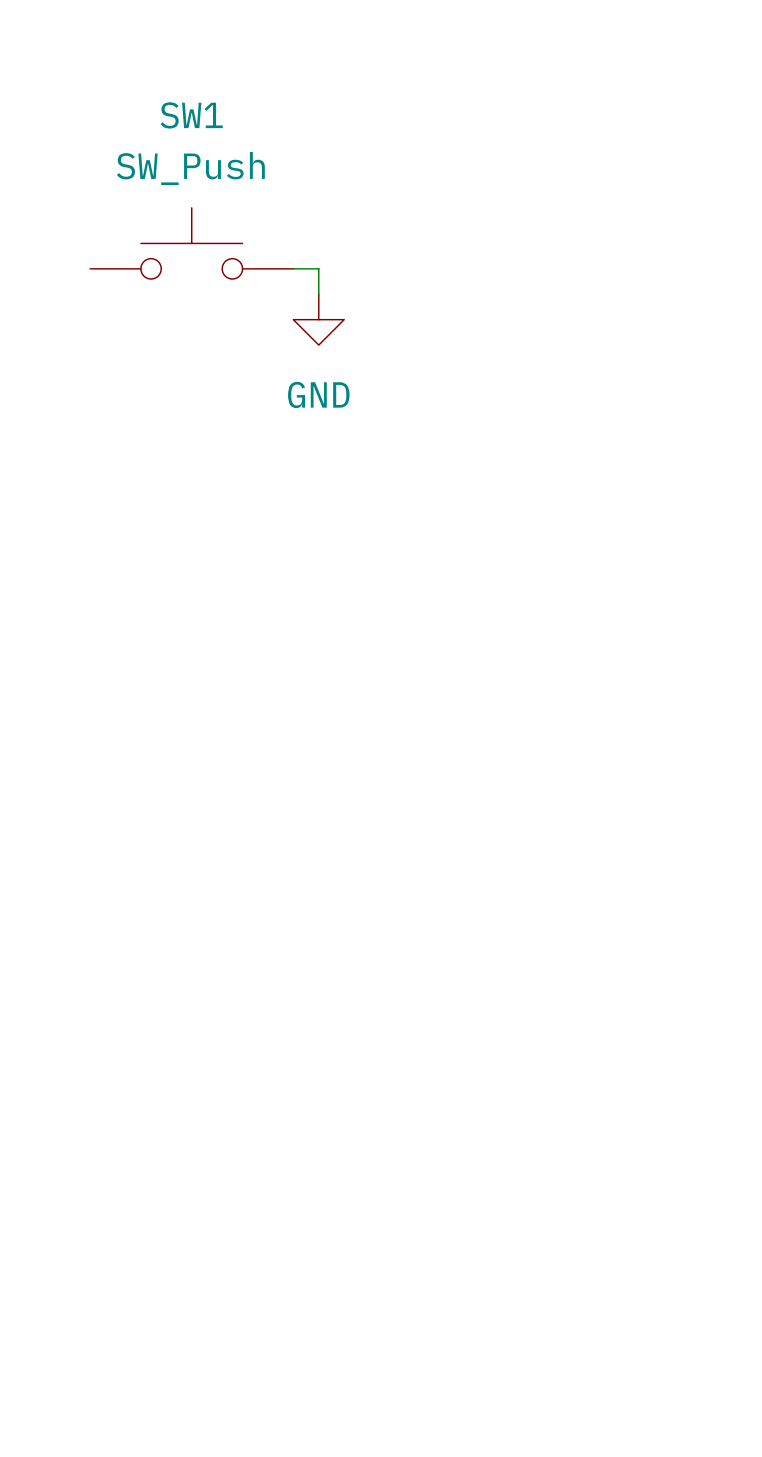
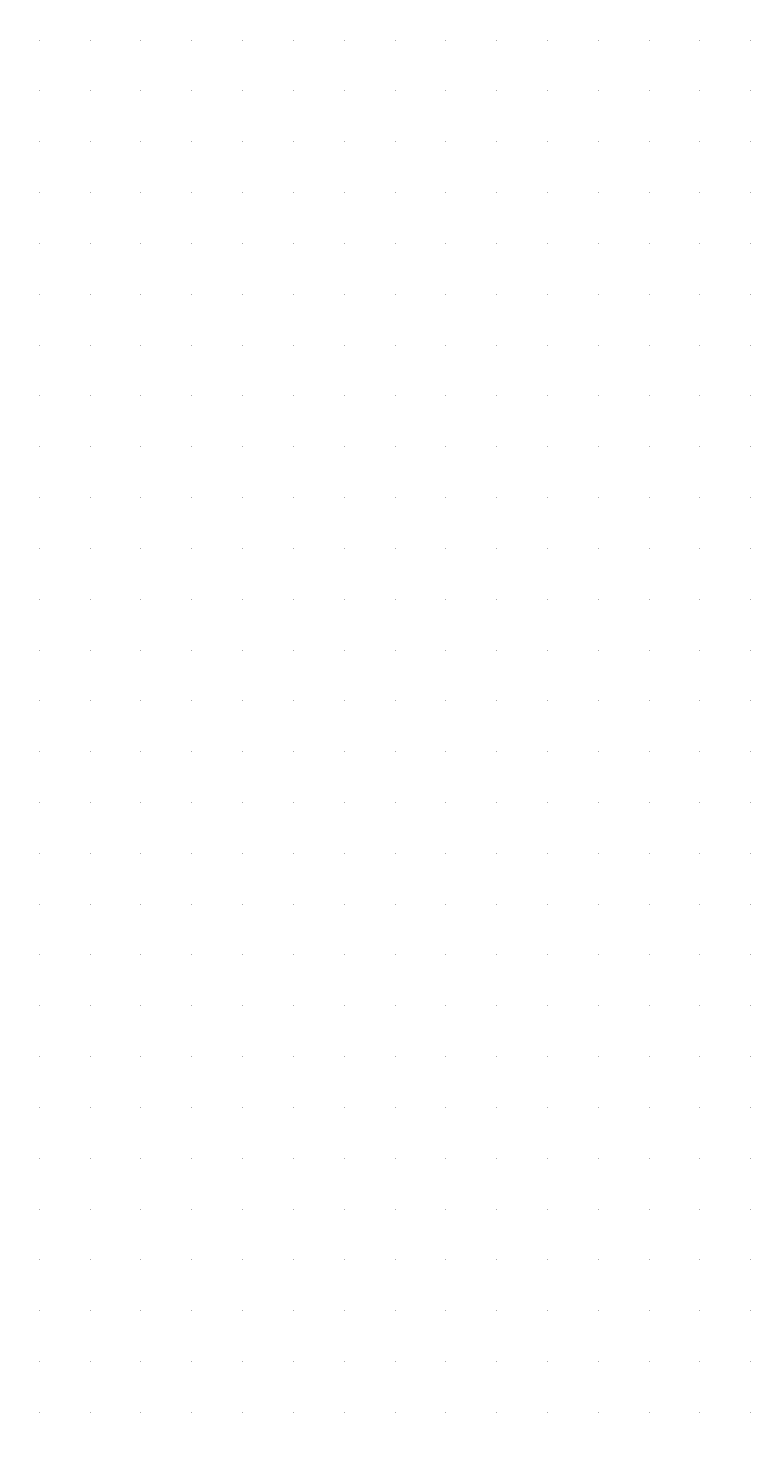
SW1: SW_Push (191, 243) -> none
wire: (293, 268) (318, 268) (318, 294) -> none
power symbol: GND (318, 319) -> none

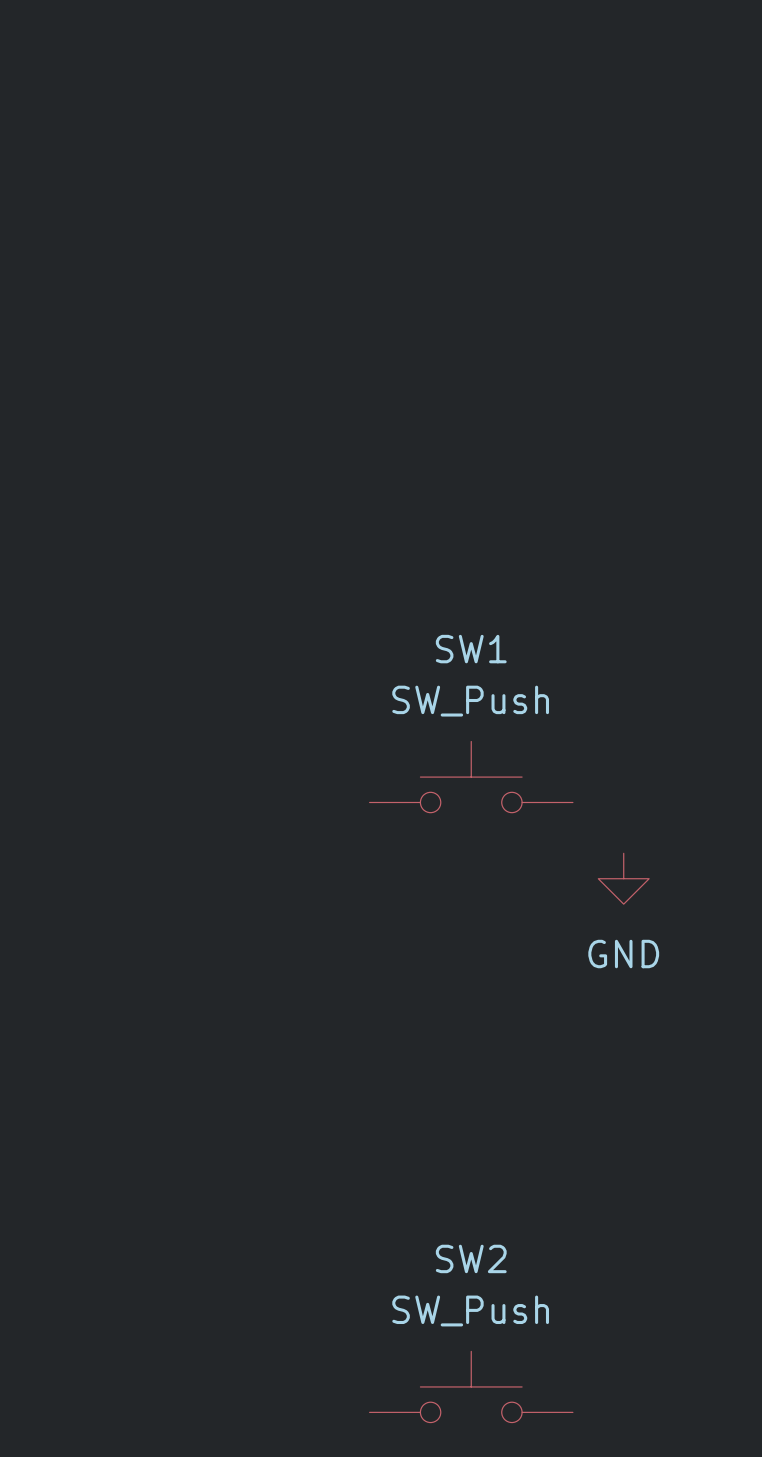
SW1: none -> SW_Push (471, 777)
power symbol: none -> GND (623, 878)
SW2: none -> SW_Push (471, 1386)

